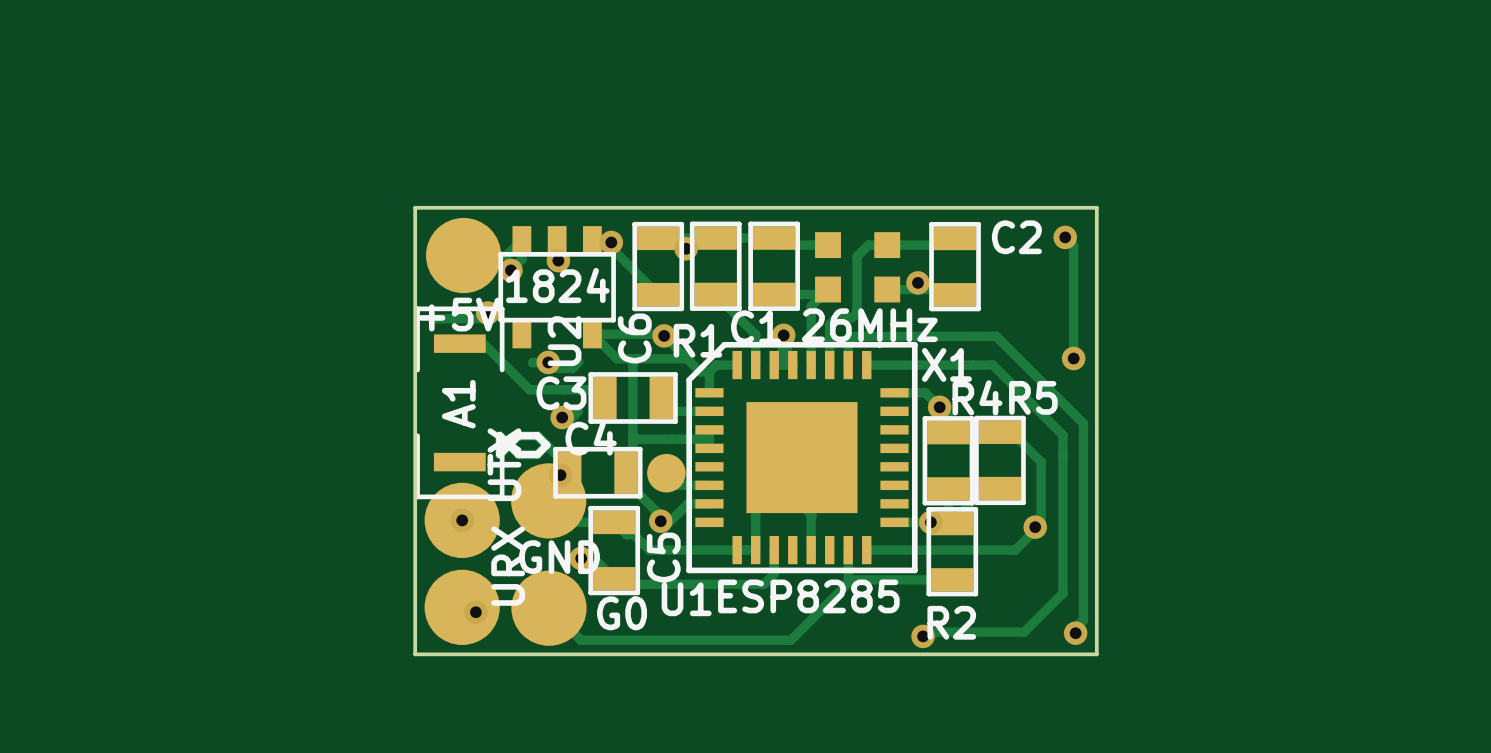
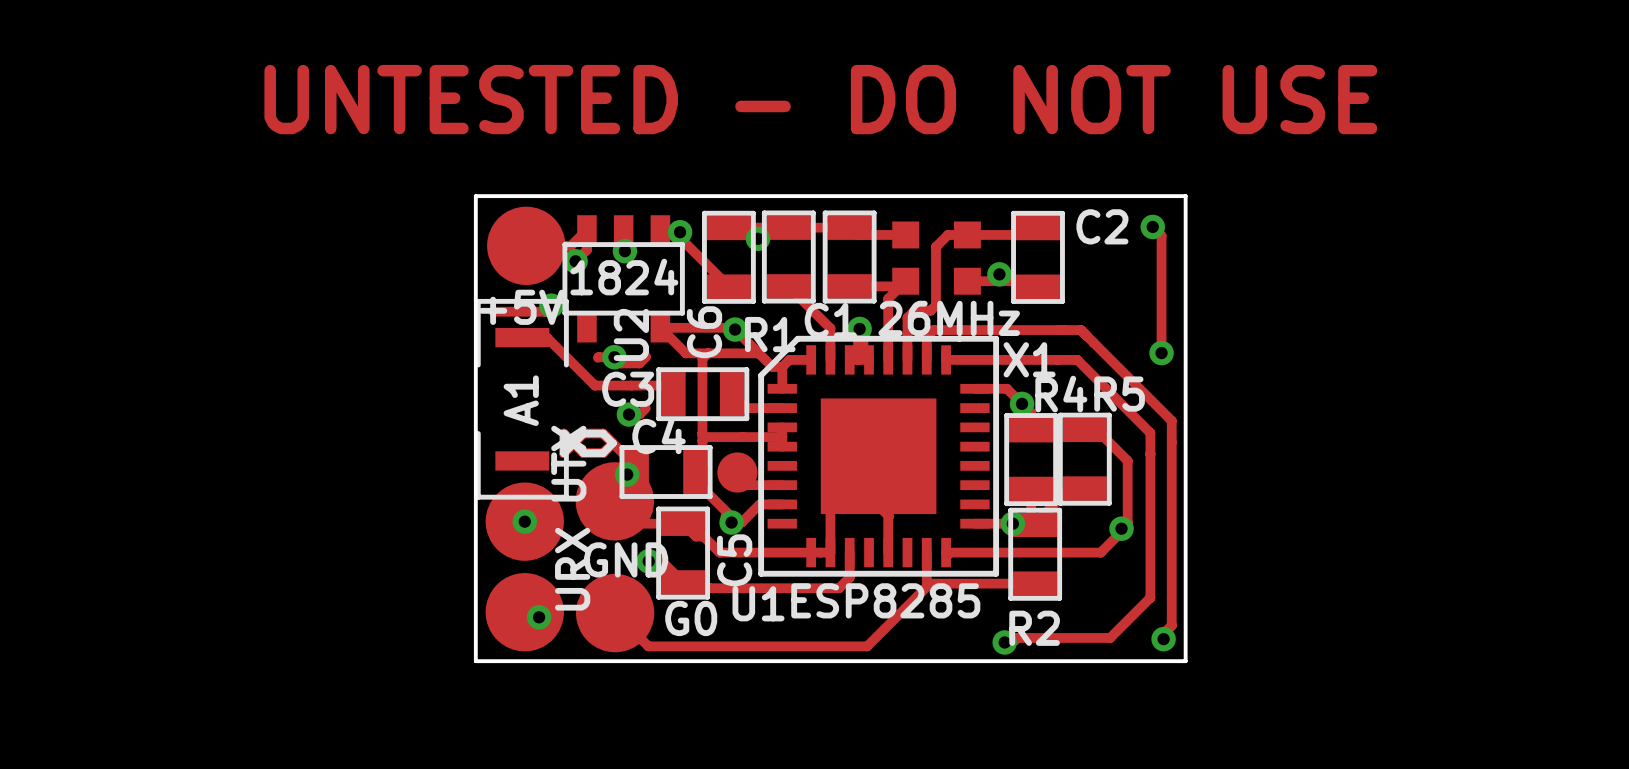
text: none -> UNTESTED - DO NOT USE (820, 99)

